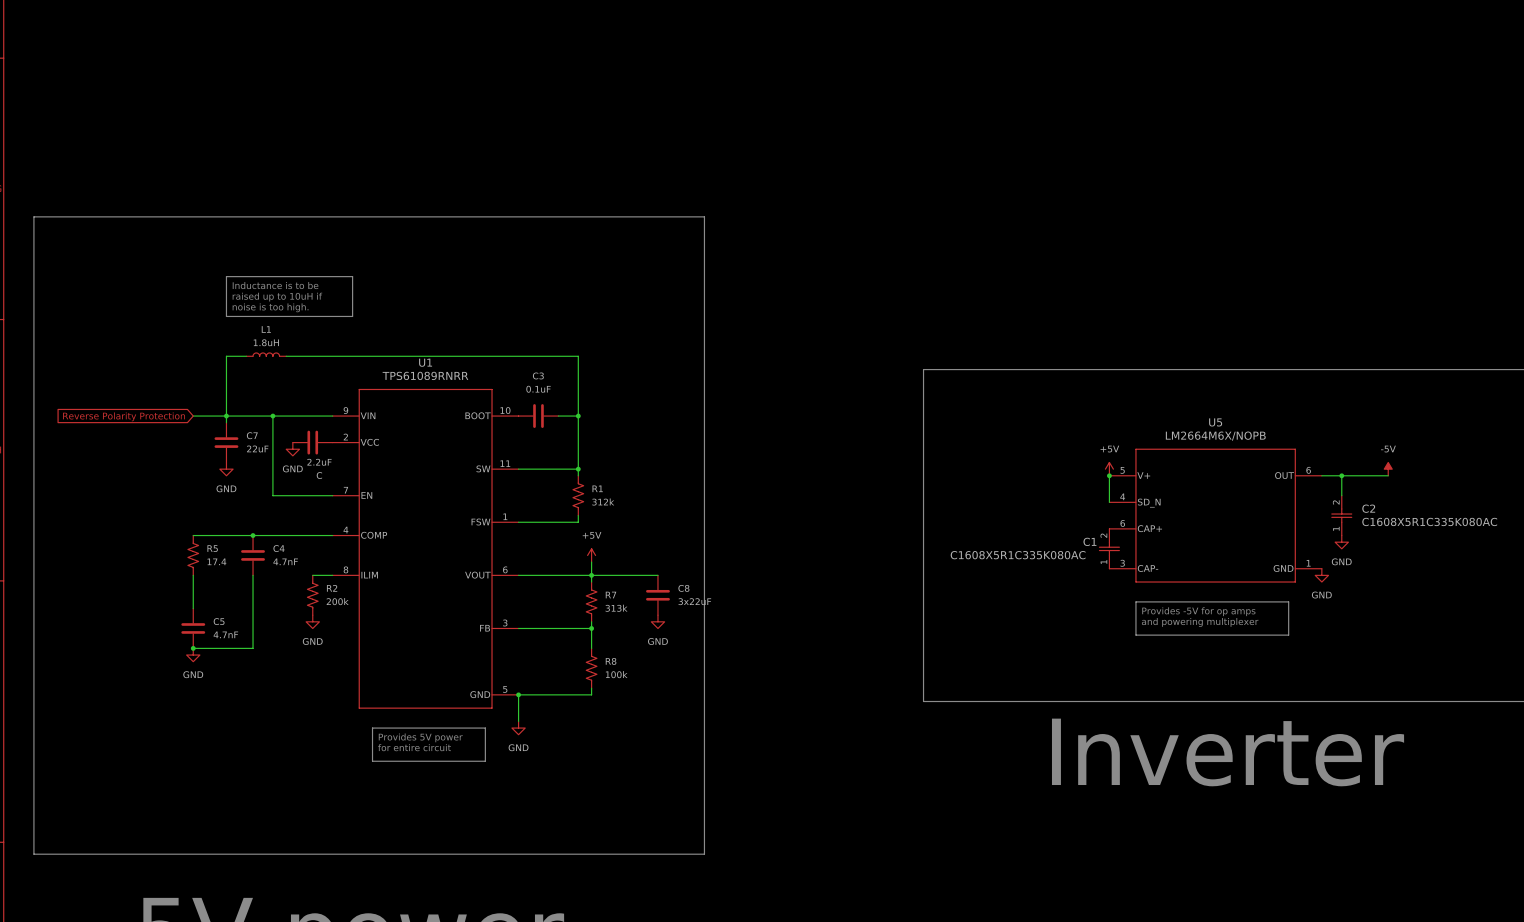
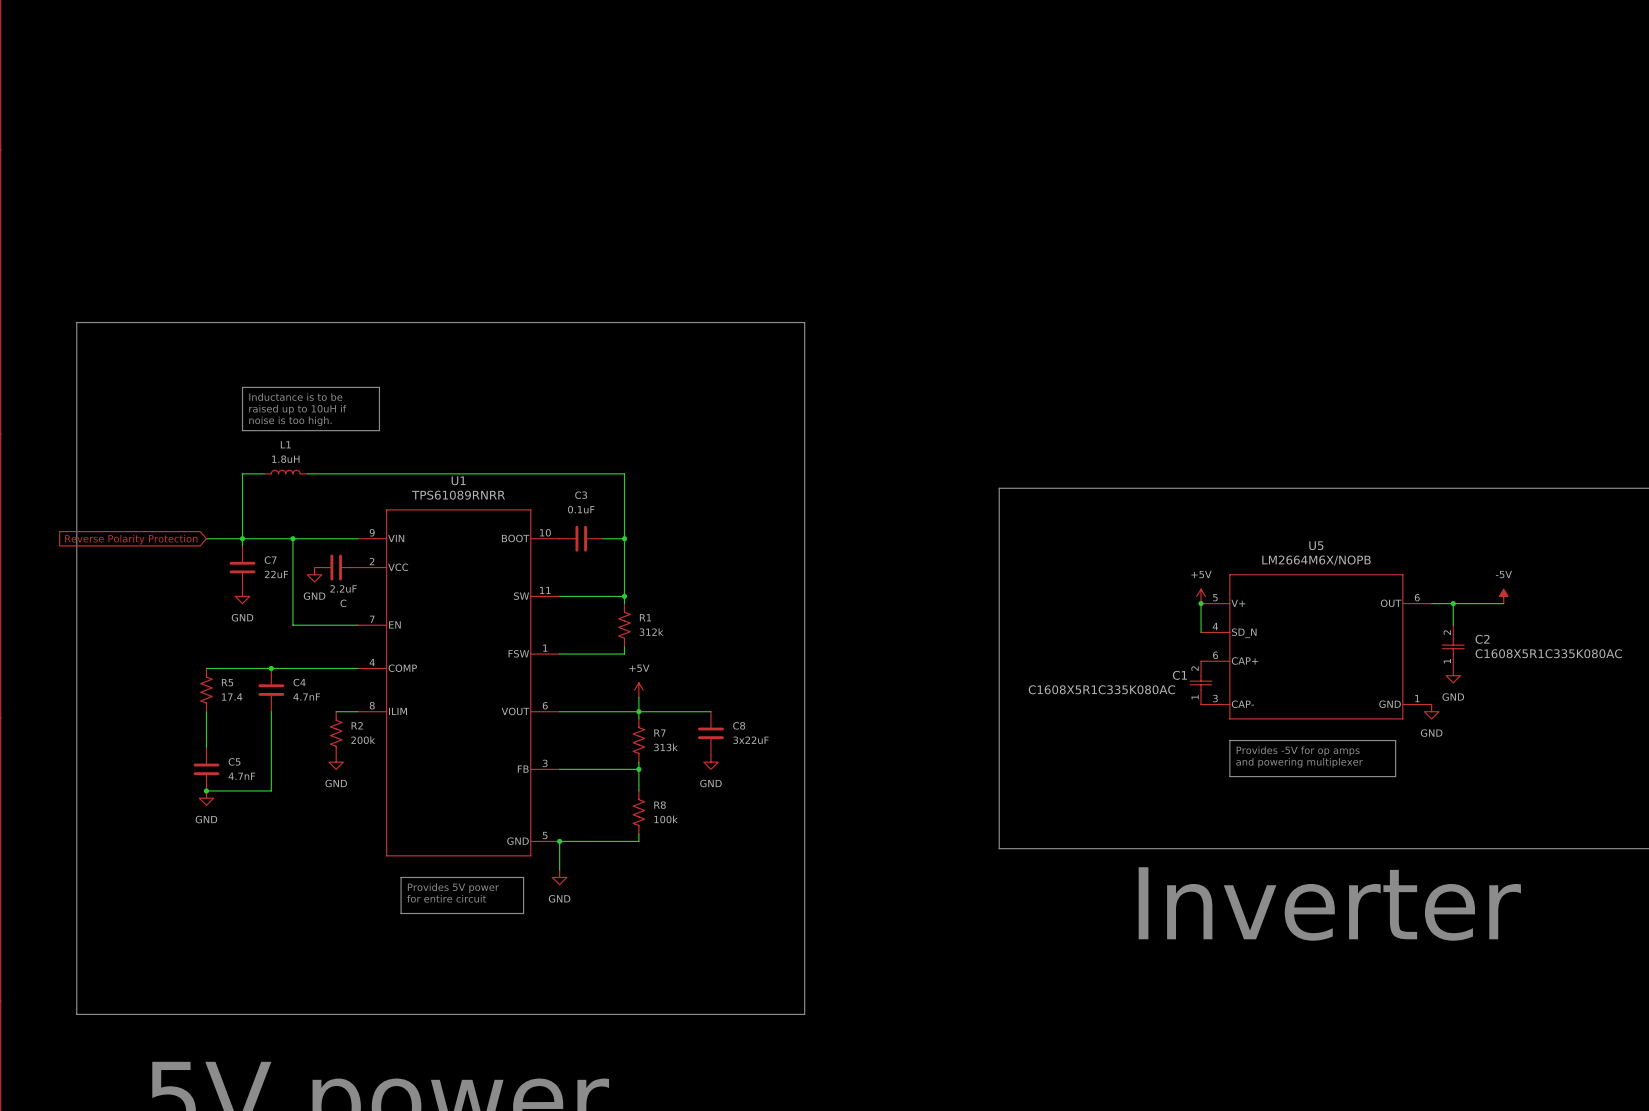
line: (73, 216) (33, 216) (33, 854) (73, 854) -> (76, 322) (76, 1014)
line: (704, 216) (704, 854) -> (761, 322) (804, 322) (804, 1014) (761, 1014)

